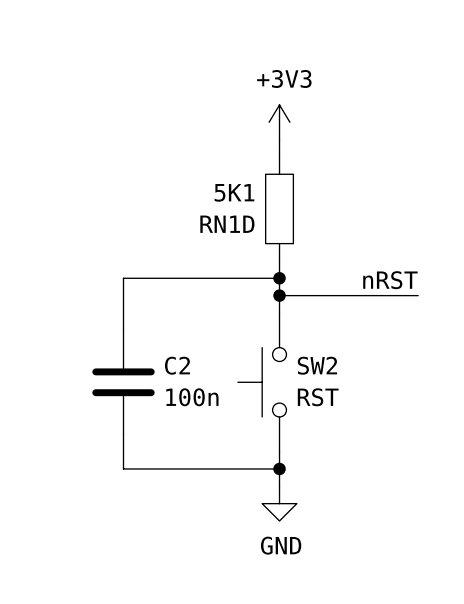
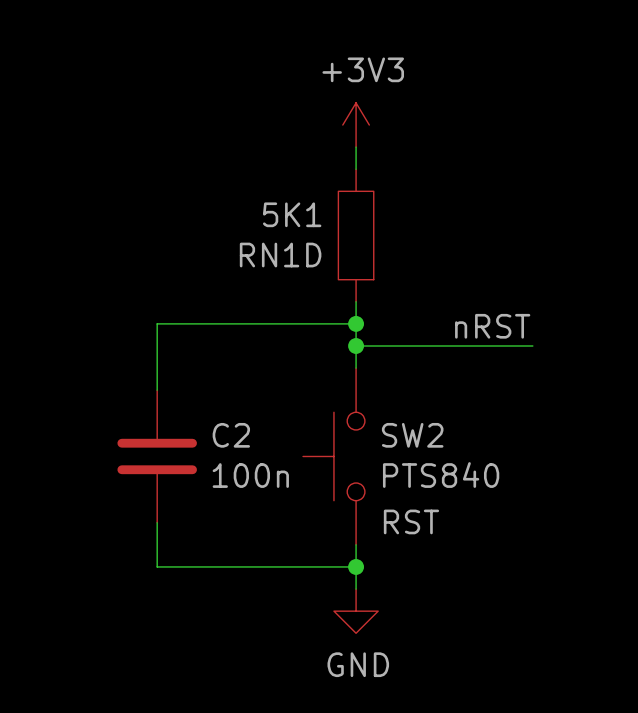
SW2 value: RST (318, 397) -> PTS840 (441, 475)
SW2 text: none -> RST (411, 521)

